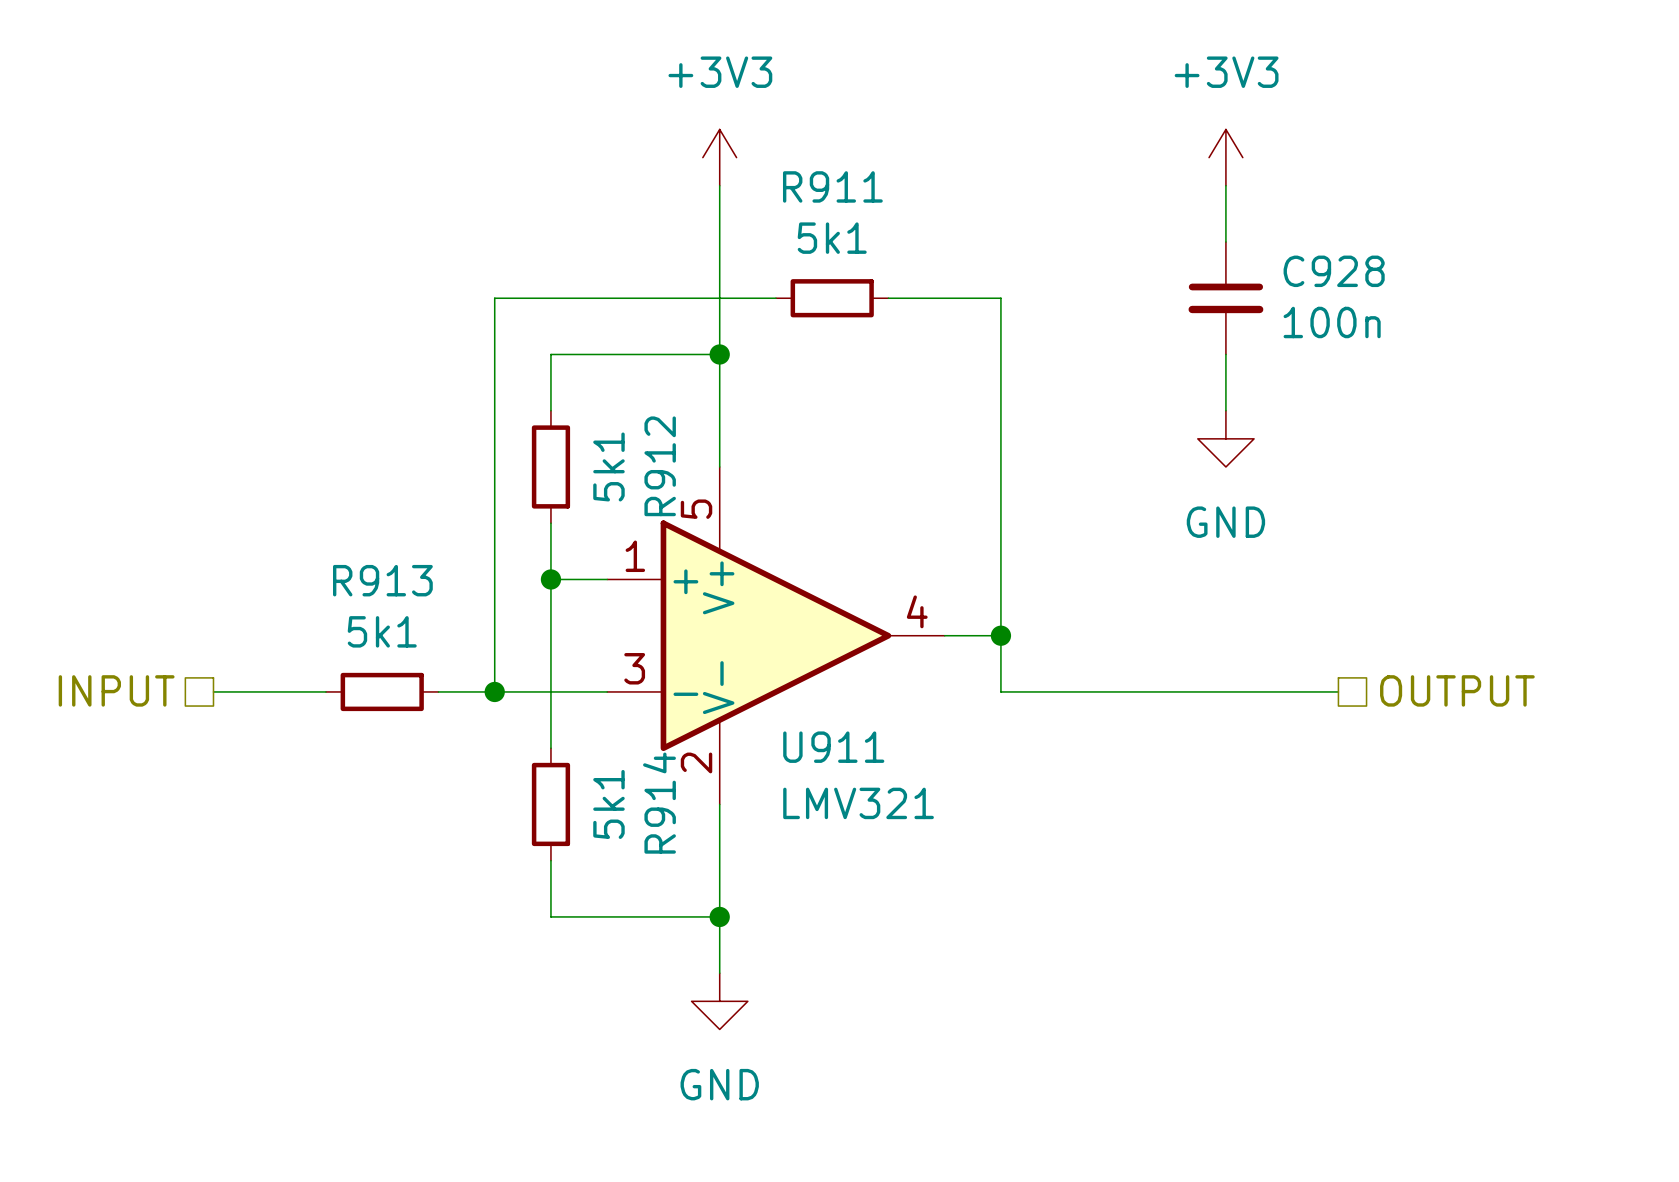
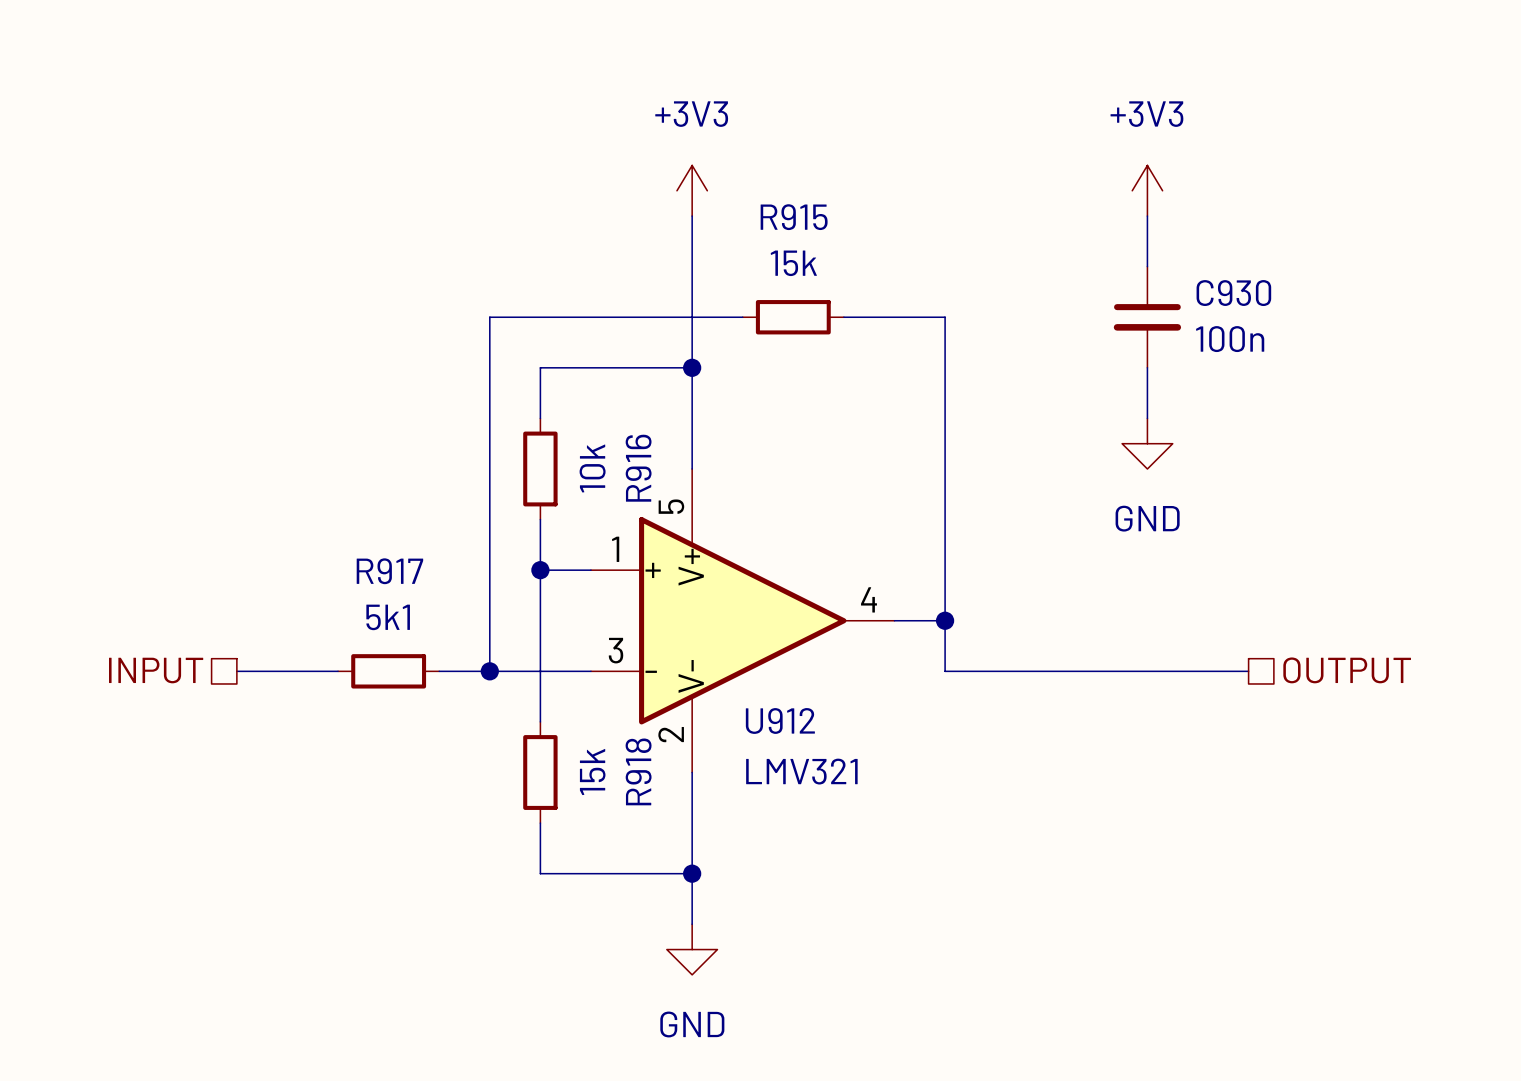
R911 name: R911 (832, 186) -> R915 (794, 217)
R911 value: 5k1 (832, 238) -> 15k (793, 263)
C928 name: C928 (1334, 271) -> C930 (1233, 293)
R912 value: 5k1 (608, 466) -> 10k (592, 468)
R912 name: R912 (660, 466) -> R916 (638, 468)
R913 name: R913 (382, 580) -> R917 (389, 571)
U911 name: U911 (833, 747) -> U912 (780, 720)
R914 name: R914 (659, 803) -> R918 (638, 771)
R914 value: 5k1 (608, 804) -> 15k (592, 772)

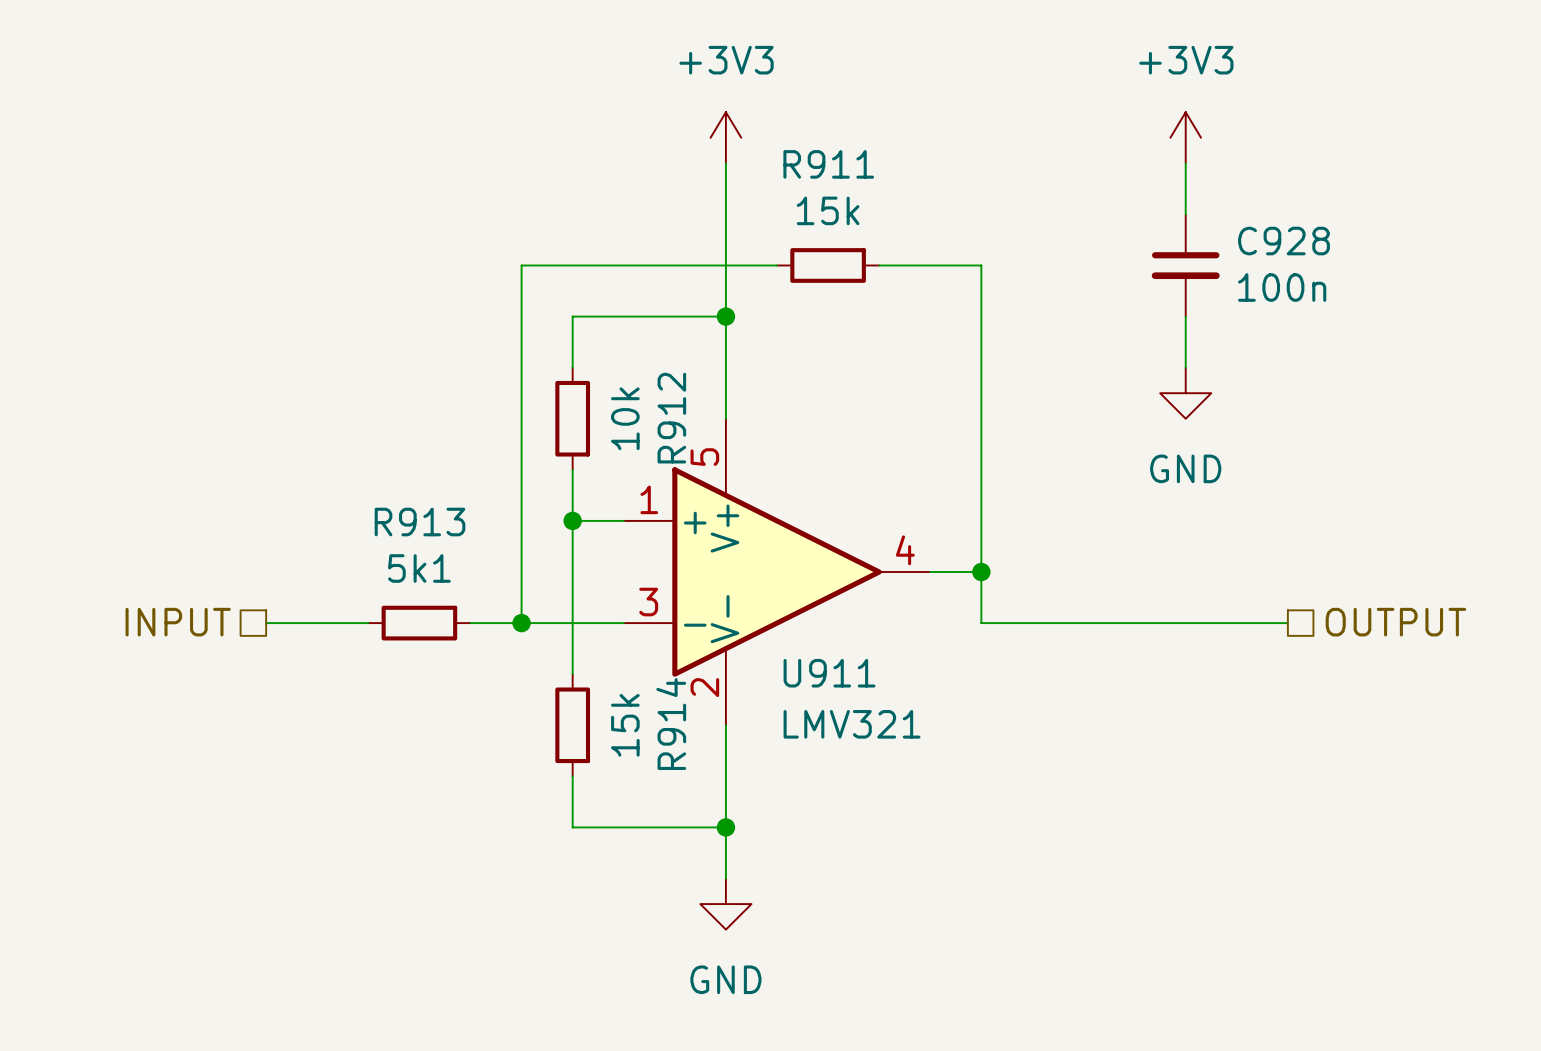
R915 name: R915 (794, 217) -> R911 (828, 164)
C930 name: C930 (1233, 293) -> C928 (1283, 241)
R916 name: R916 (638, 468) -> R912 (671, 418)
R917 name: R917 (389, 571) -> R913 (420, 522)
U912 name: U912 (780, 720) -> U911 (829, 673)
R918 name: R918 (638, 771) -> R914 (671, 724)

